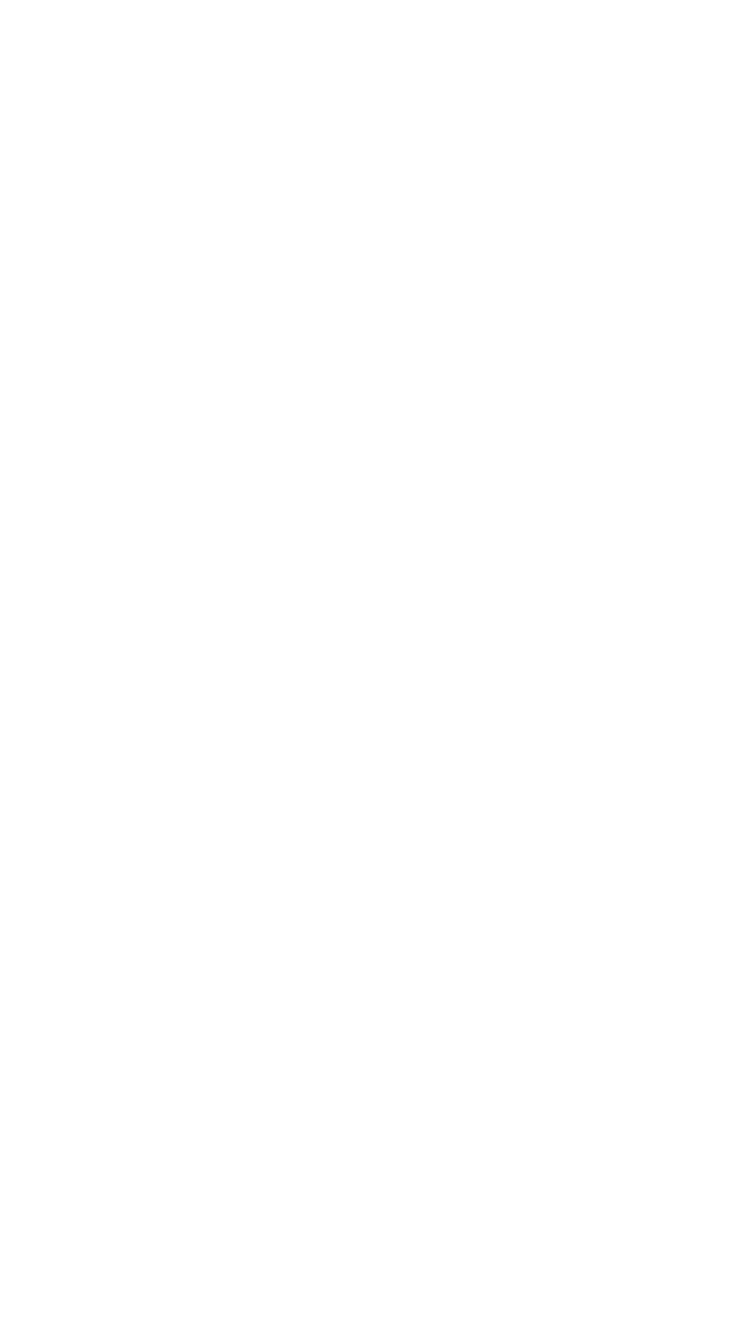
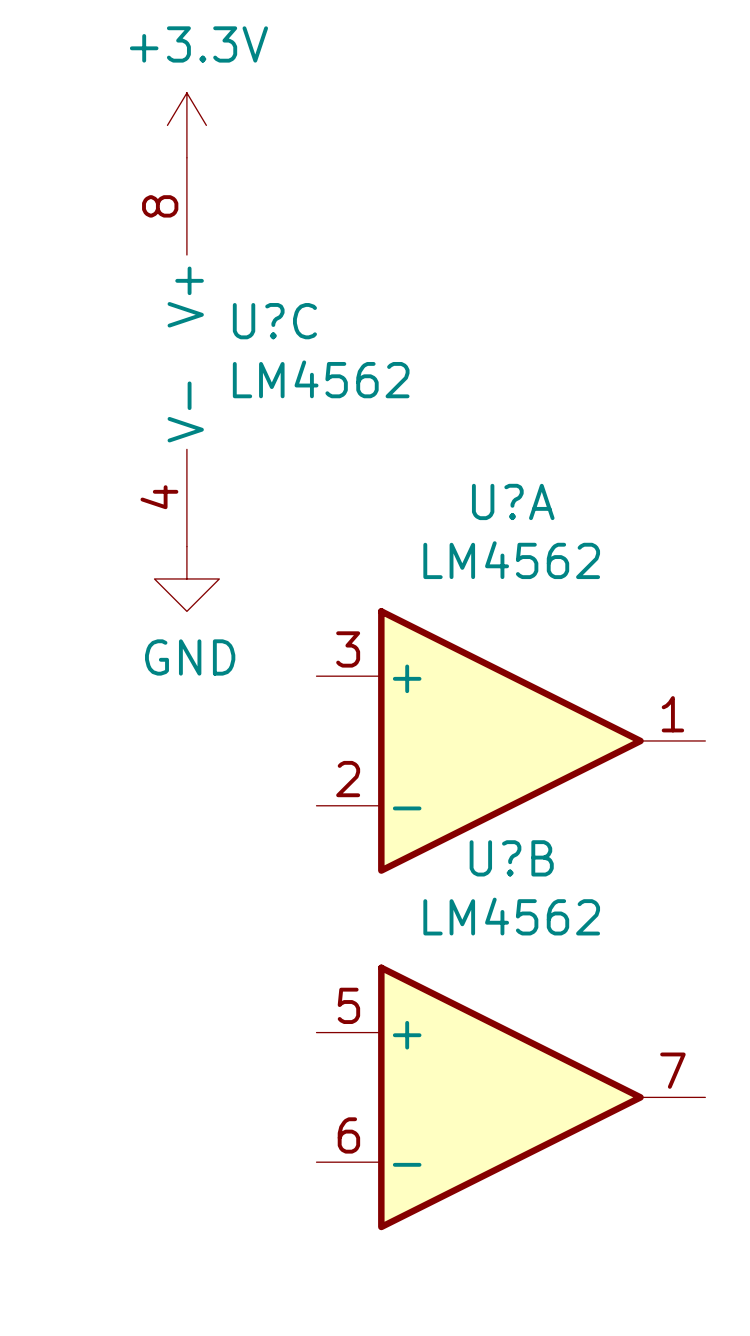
power symbol: none -> +3.3V (186, 125)
U?C: none -> LM4562 (186, 352)
power symbol: none -> GND (186, 578)
U?A: none -> LM4562 (510, 740)
U?B: none -> LM4562 (510, 1097)

